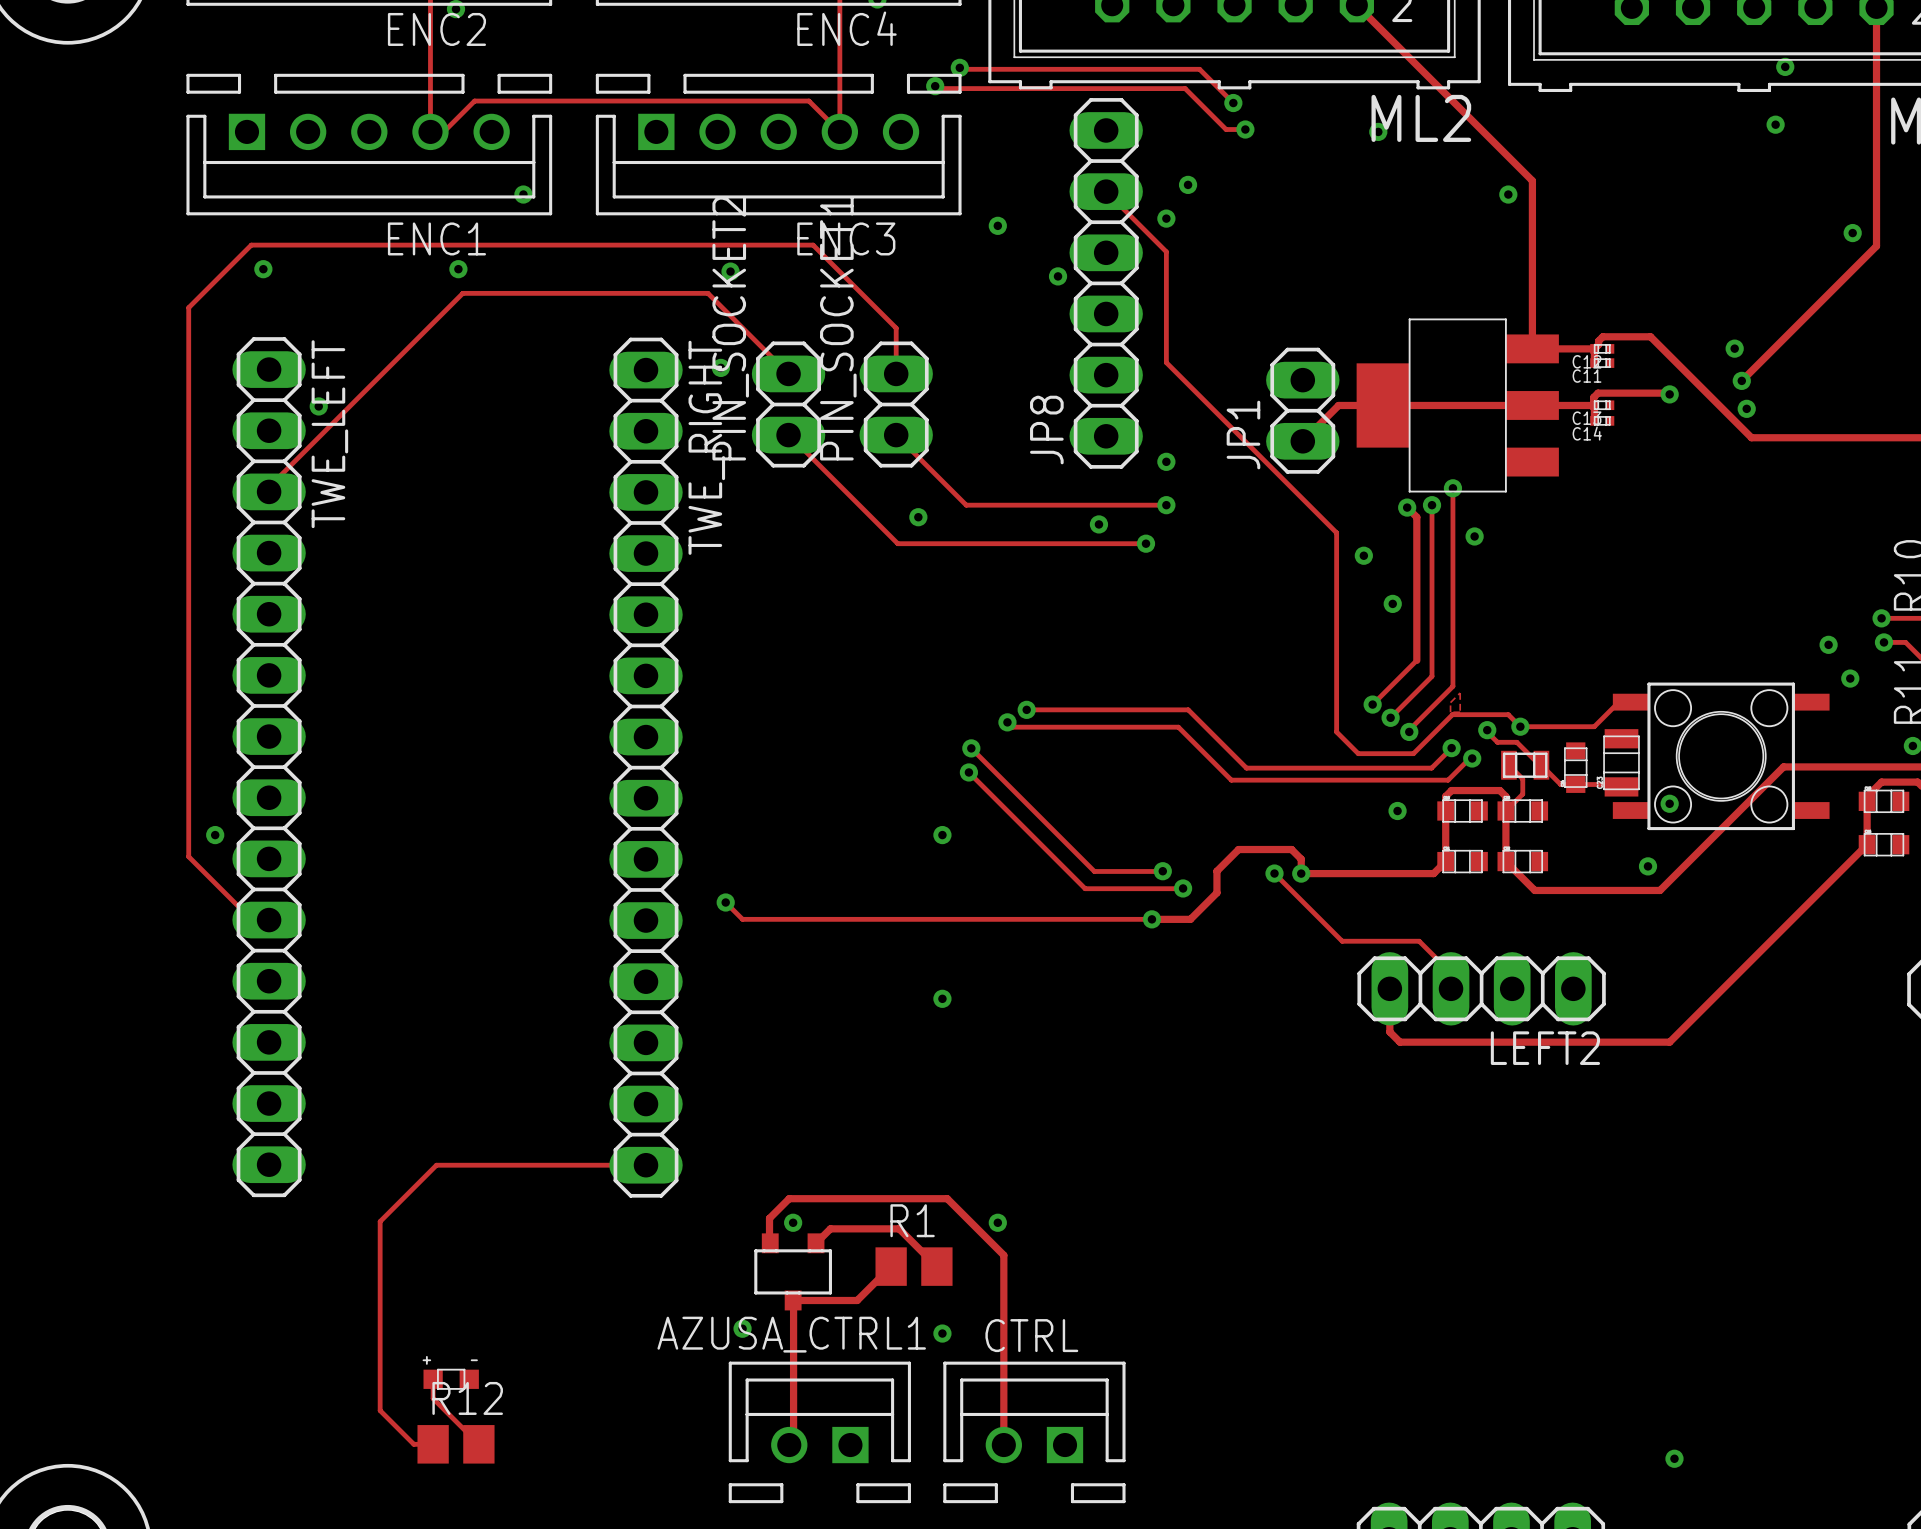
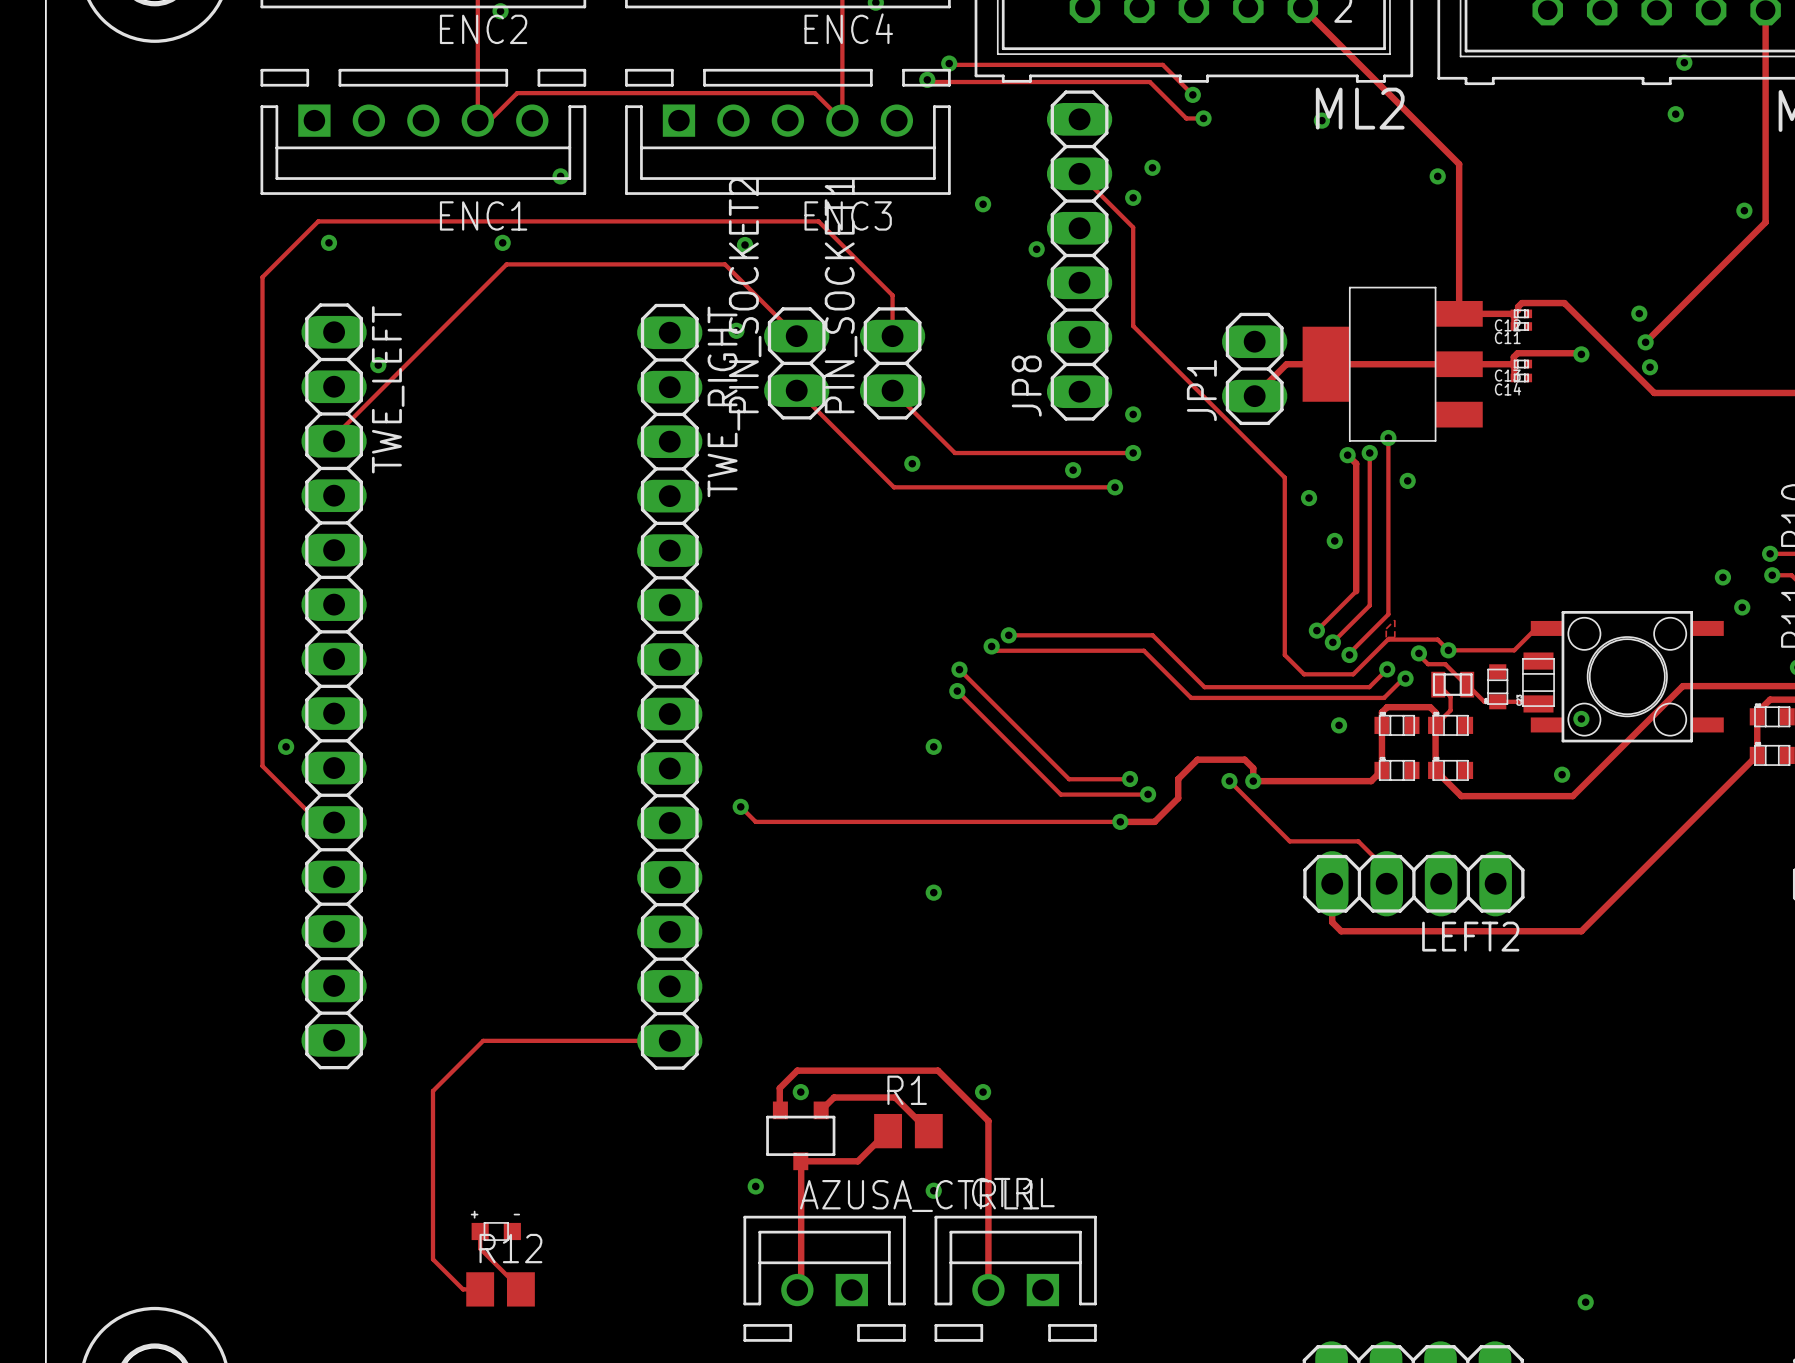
AZUSA_CTRL1 name position: AZUSA_CTRL1 (791, 1334) -> AZUSA_CTRL1 (919, 1196)

